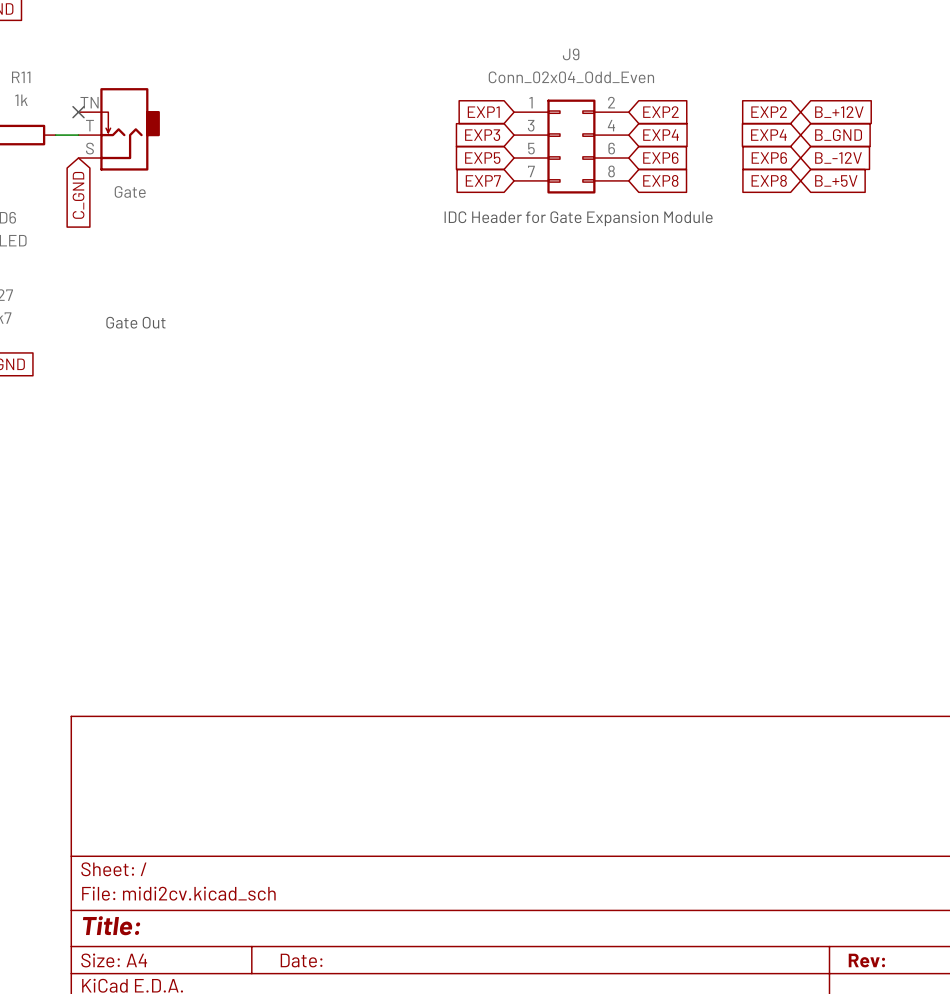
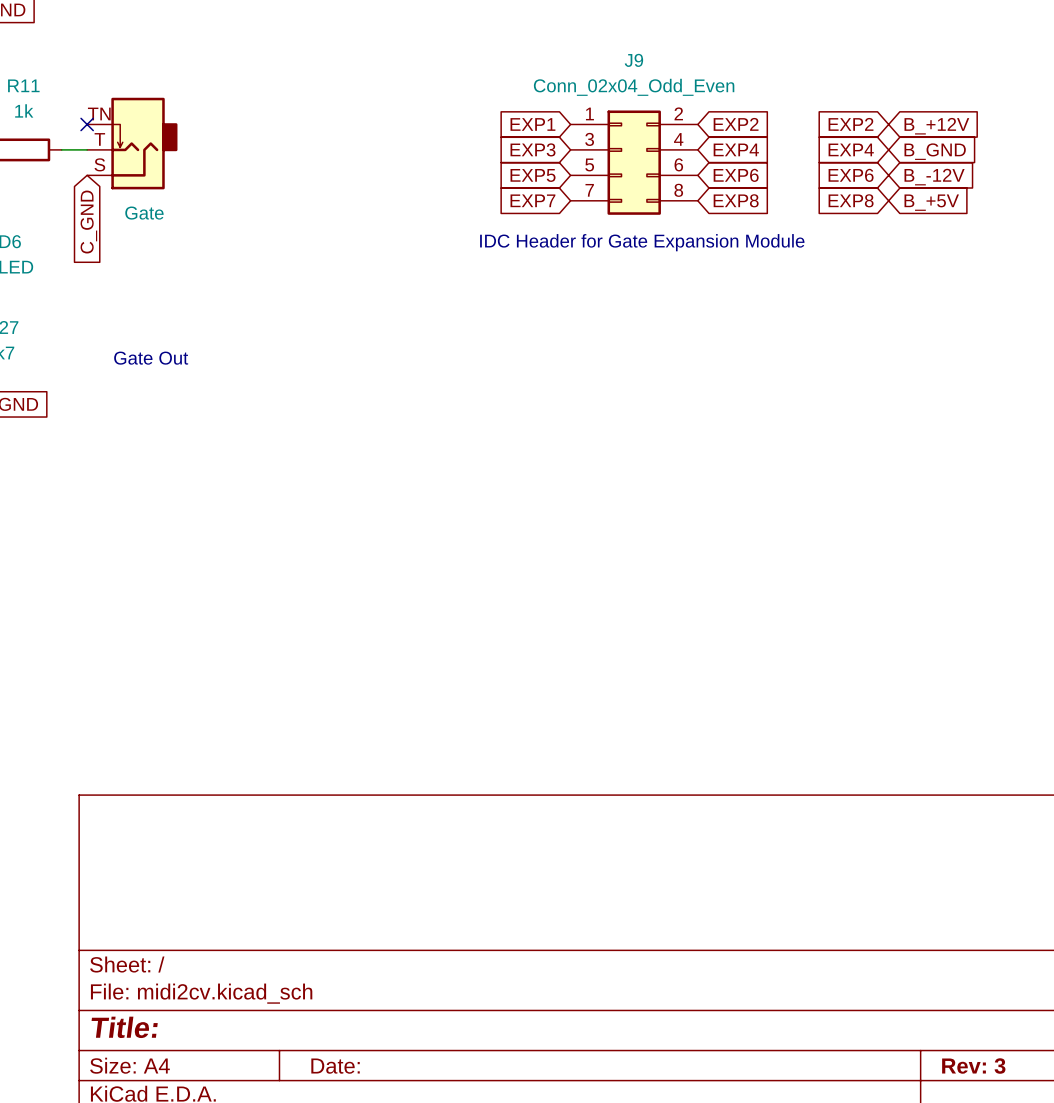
title block: Rev: (866, 960) -> Rev: 3 (973, 1066)

